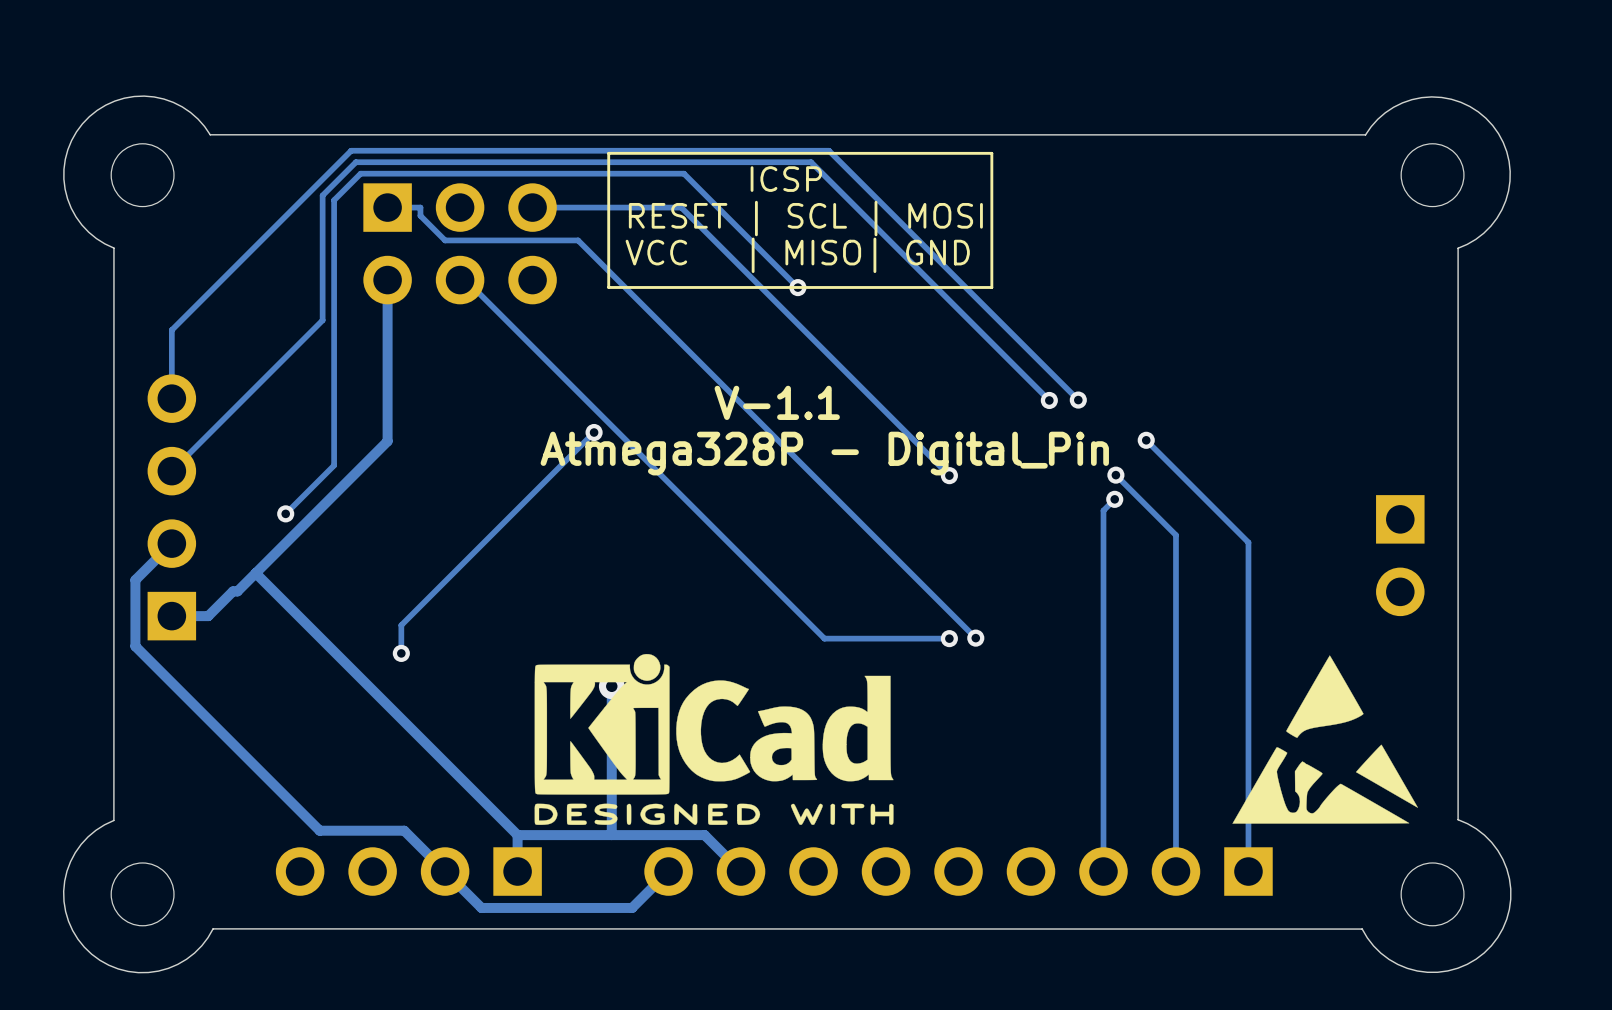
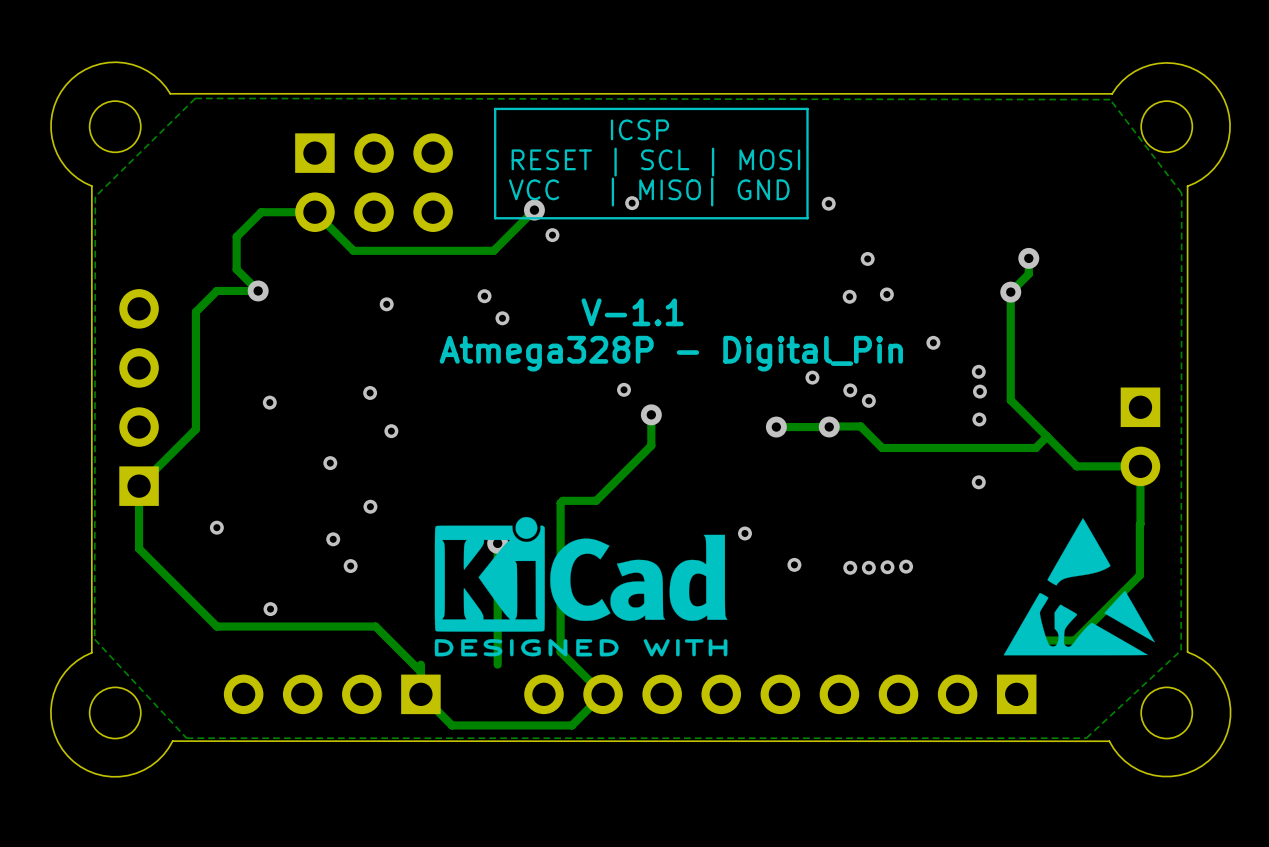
zone outline: none -> (195, 98) (1110, 99) (1181, 193) (1181, 650) (1086, 738) (186, 738) (94, 639) (95, 196) (195, 98)
track: (387, 207) (420, 207) (420, 215) (445, 240) (578, 240) (975, 638) -> none
track: (532, 207) (681, 207) (949, 475) -> none
via: none -> (828, 203)
track: none -> (534, 210) (493, 250) (353, 250) (314, 212) (261, 212) (236, 236) (236, 269) (258, 290) (216, 290) (195, 311) (195, 429) (139, 486) (139, 548) (216, 626) (375, 626) (420, 671) (420, 694) (452, 725) (571, 725) (603, 694)
via: none -> (534, 210)
track: (387, 280) (387, 441) (255, 573) -> none
track: (460, 280) (465, 280) (824, 638) (949, 638) -> none
track: (797, 287) (683, 173) (360, 173) (334, 200) (334, 465) (285, 513) -> none
via position: (797, 287) -> (632, 203)
via: none -> (552, 235)
track: none -> (1028, 258) (1028, 274) (1010, 292) (1010, 400) (1076, 466) (1140, 466) (1139, 575) (1074, 640) (1038, 640)
via: none -> (1028, 258)
via: none -> (867, 258)
via: none -> (258, 290)
via: none -> (1010, 292)
via: none -> (886, 294)
via: none -> (484, 296)
via: none -> (386, 304)
track: (171, 398) (171, 330) (351, 150) (829, 150) (1078, 400) -> none
track: (1049, 400) (811, 162) (355, 162) (322, 195) (322, 320) (171, 471) -> none
via position: (1049, 400) -> (849, 296)
via: (1078, 400) -> none
via: none -> (502, 318)
track: (594, 432) (401, 625) (401, 653) -> none
via: (594, 432) -> none
track: (1146, 440) (1248, 542) (1248, 871) -> none
via: (949, 475) -> none
track: (1115, 475) (1175, 535) (1175, 871) -> none
via: (1115, 475) -> none
via: none -> (978, 371)
via: none -> (812, 377)
via: none -> (624, 389)
via: none -> (850, 390)
track: (1114, 499) (1103, 510) (1103, 871) -> none
via: (1114, 499) -> none
via: none -> (979, 391)
via: none -> (370, 392)
via: none -> (868, 400)
via position: (285, 513) -> (269, 402)
via: none -> (651, 414)
via: none -> (979, 419)
track: (171, 543) (135, 580) (135, 646) (319, 830) (404, 830) (481, 907) (632, 907) (668, 871) -> none
track: none -> (776, 427) (860, 426) (882, 447) (1035, 447) (1047, 436)
via: none -> (776, 427)
via: none -> (829, 426)
via: none -> (391, 431)
track: (255, 573) (517, 835) (704, 835) -> (651, 414) (651, 445) (596, 500) (562, 500) (560, 503) (560, 651) (573, 664)
track: (255, 573) (237, 591) (232, 591) (208, 616) (171, 616) -> none
via: none -> (330, 463)
via: none -> (978, 482)
via: (949, 638) -> none
via: (975, 638) -> none
via: none -> (370, 506)
via: (401, 653) -> none
via: none -> (216, 527)
via: none -> (744, 533)
via: none -> (333, 539)
via: none -> (794, 564)
via: none -> (350, 566)
via: none -> (906, 566)
via: none -> (887, 567)
via: none -> (850, 567)
via: none -> (868, 567)
via: none -> (270, 609)

